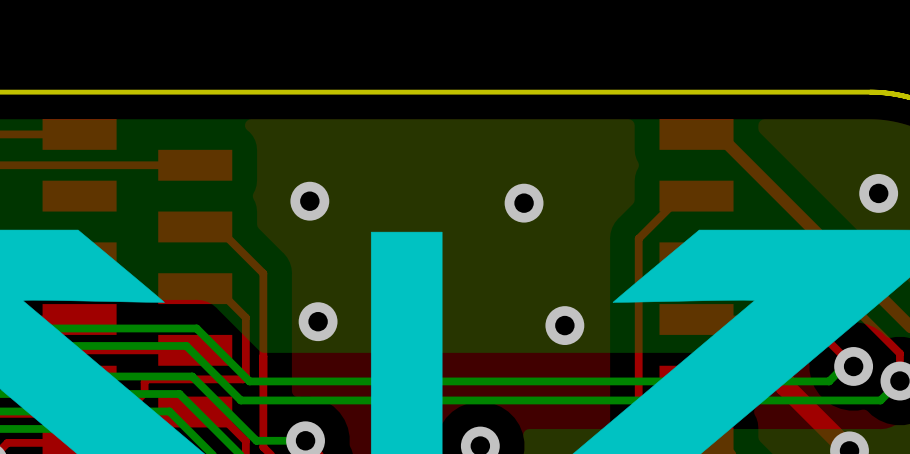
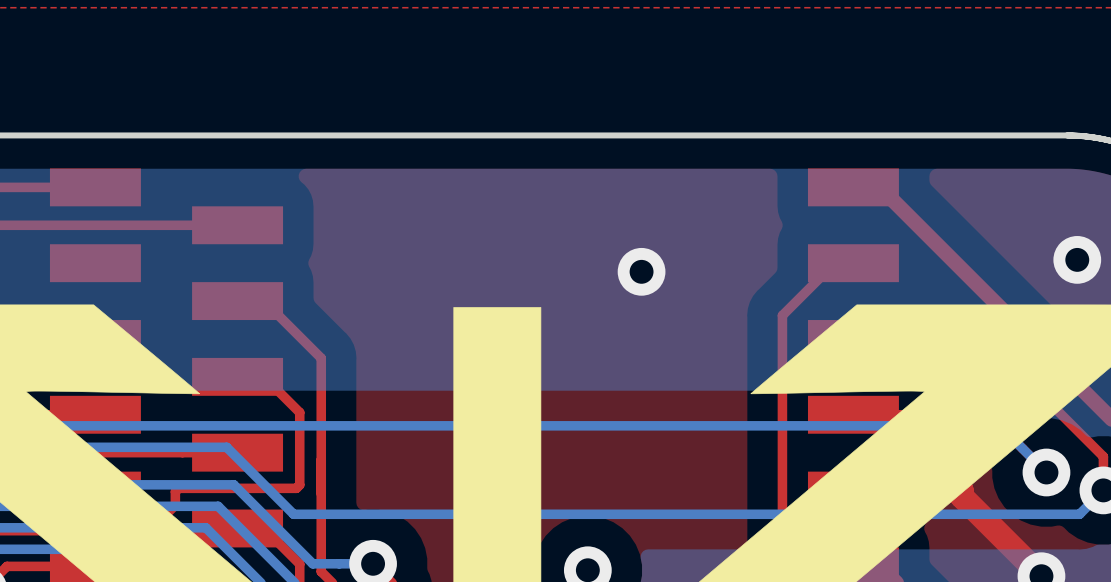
via: (309, 201) -> none
via: (318, 321) -> none
via: (564, 325) -> none
bottom track: (196, 328) (249, 381) (829, 381) (844, 366) (853, 366) -> (239, 425) (999, 425) (1046, 472)

